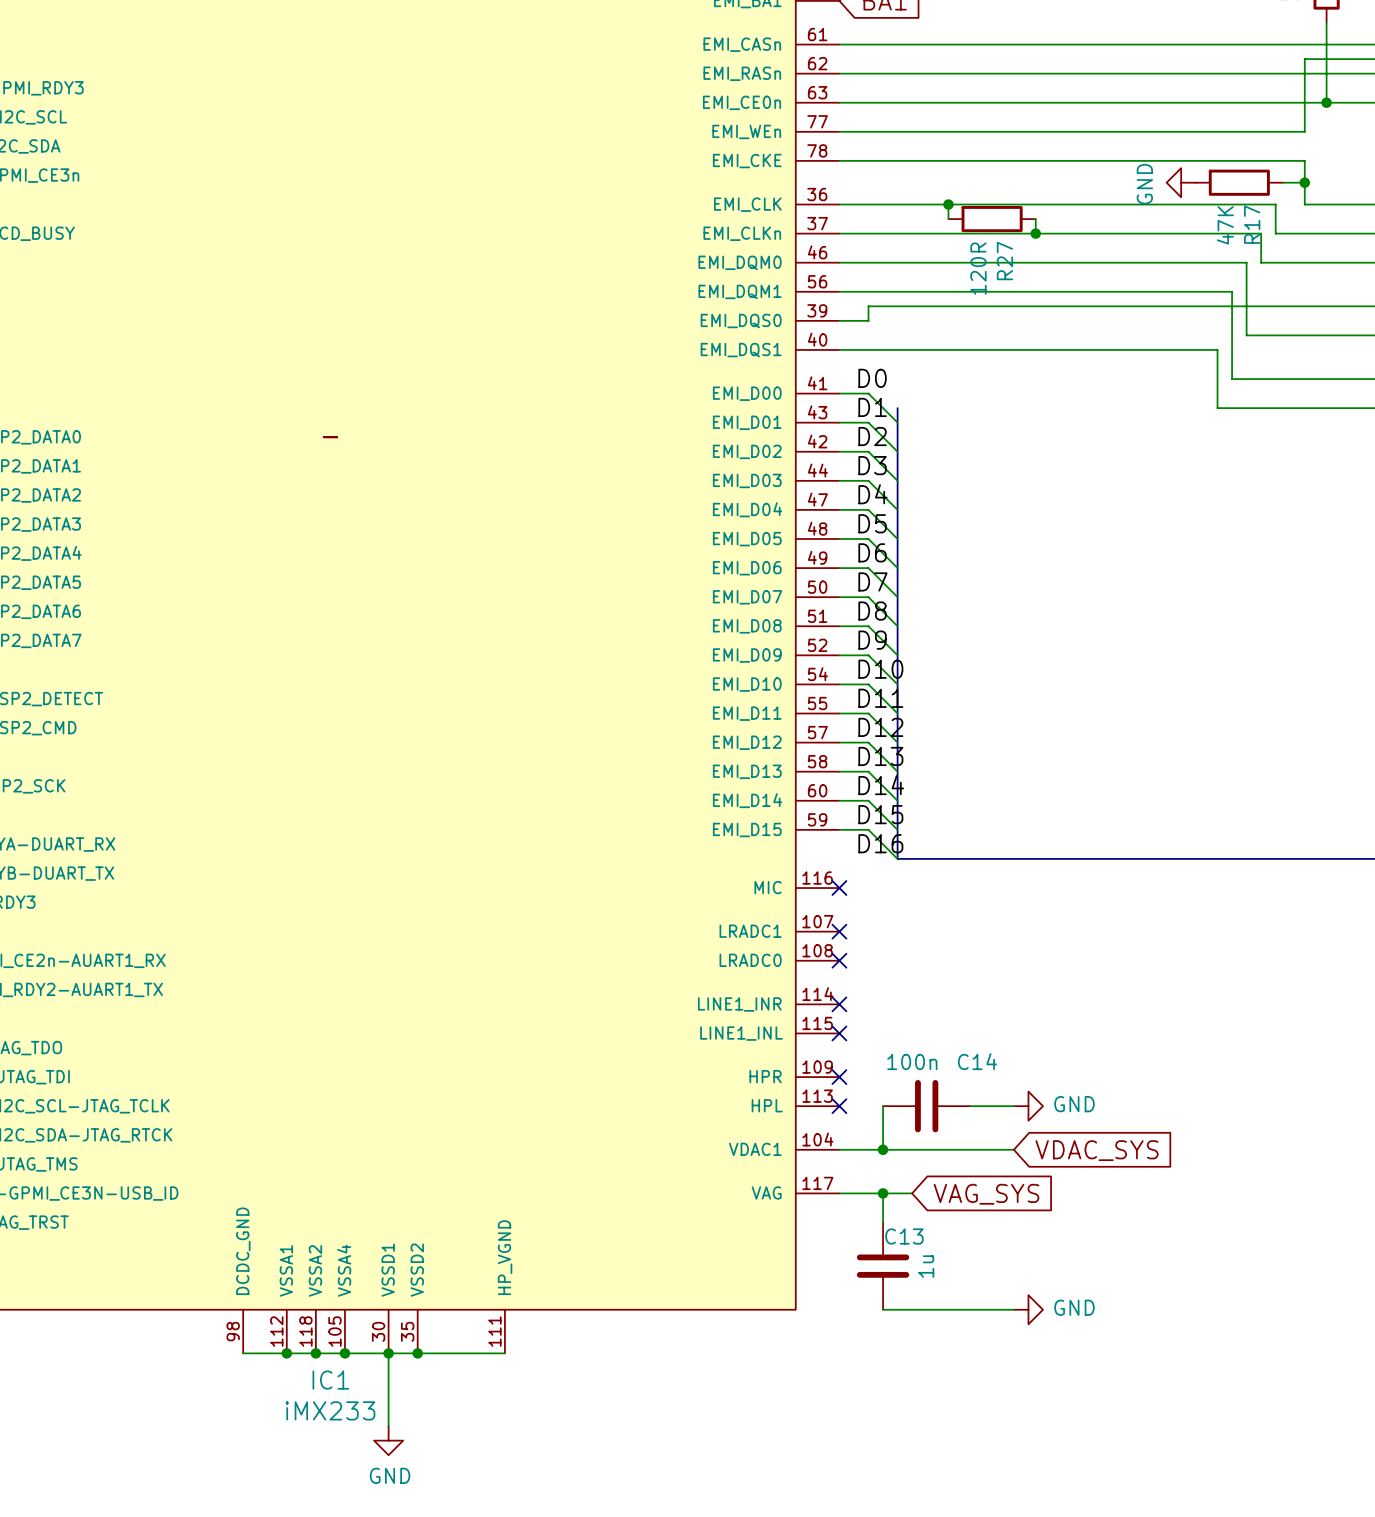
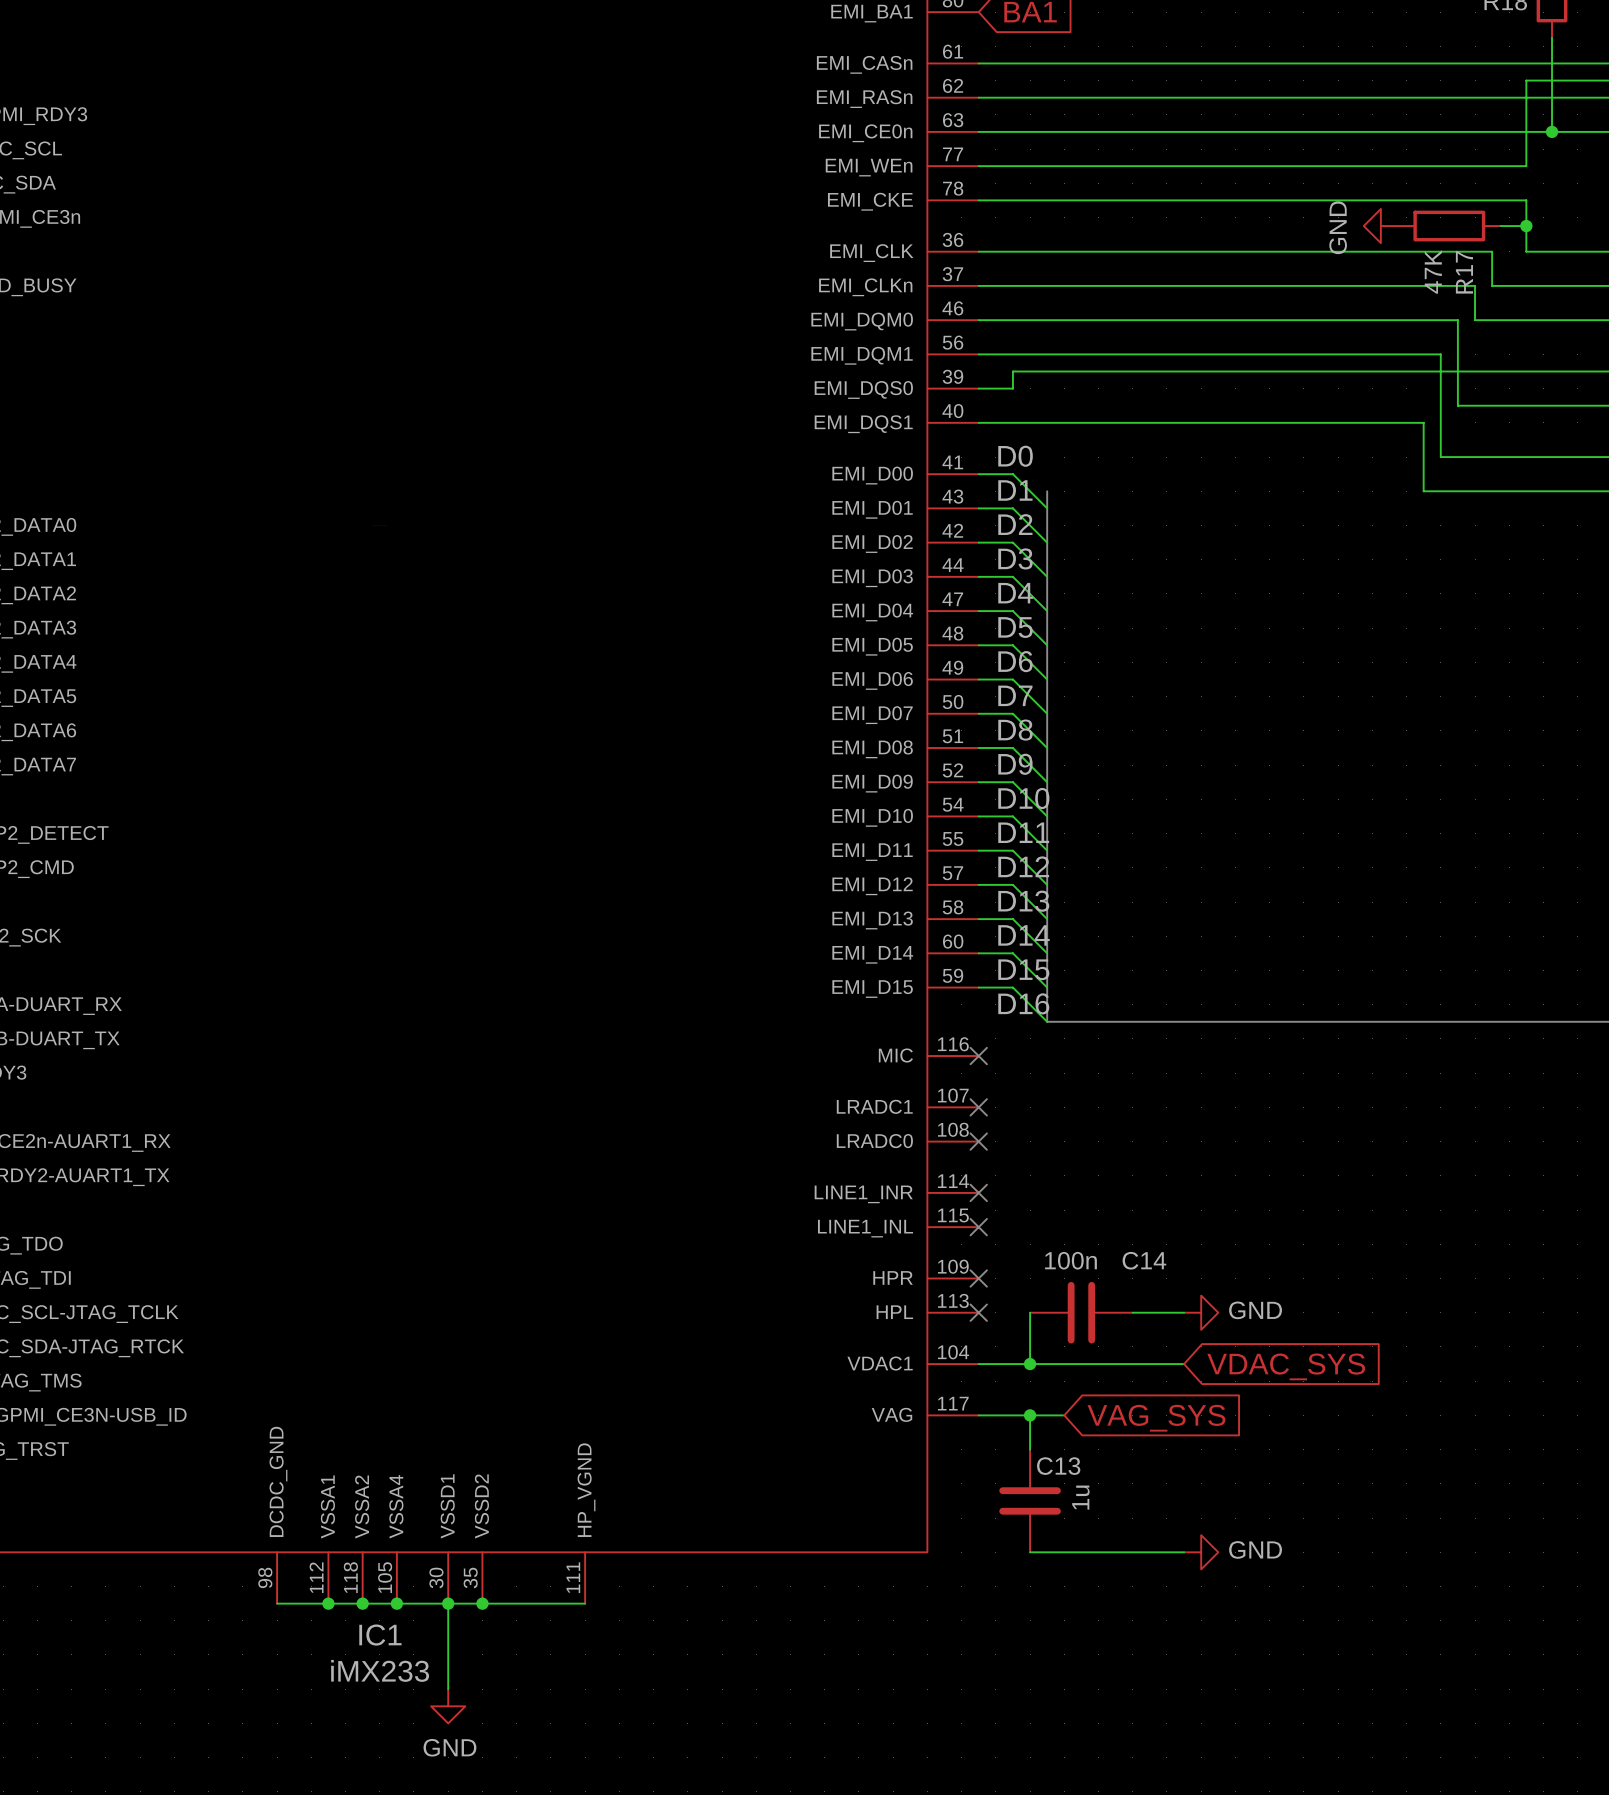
wire: (948, 204) (948, 219) -> none
junction: (948, 204) -> none
R27: 120R (992, 219) -> none
wire: (1035, 219) (1035, 233) -> none
junction: (1035, 233) -> none

